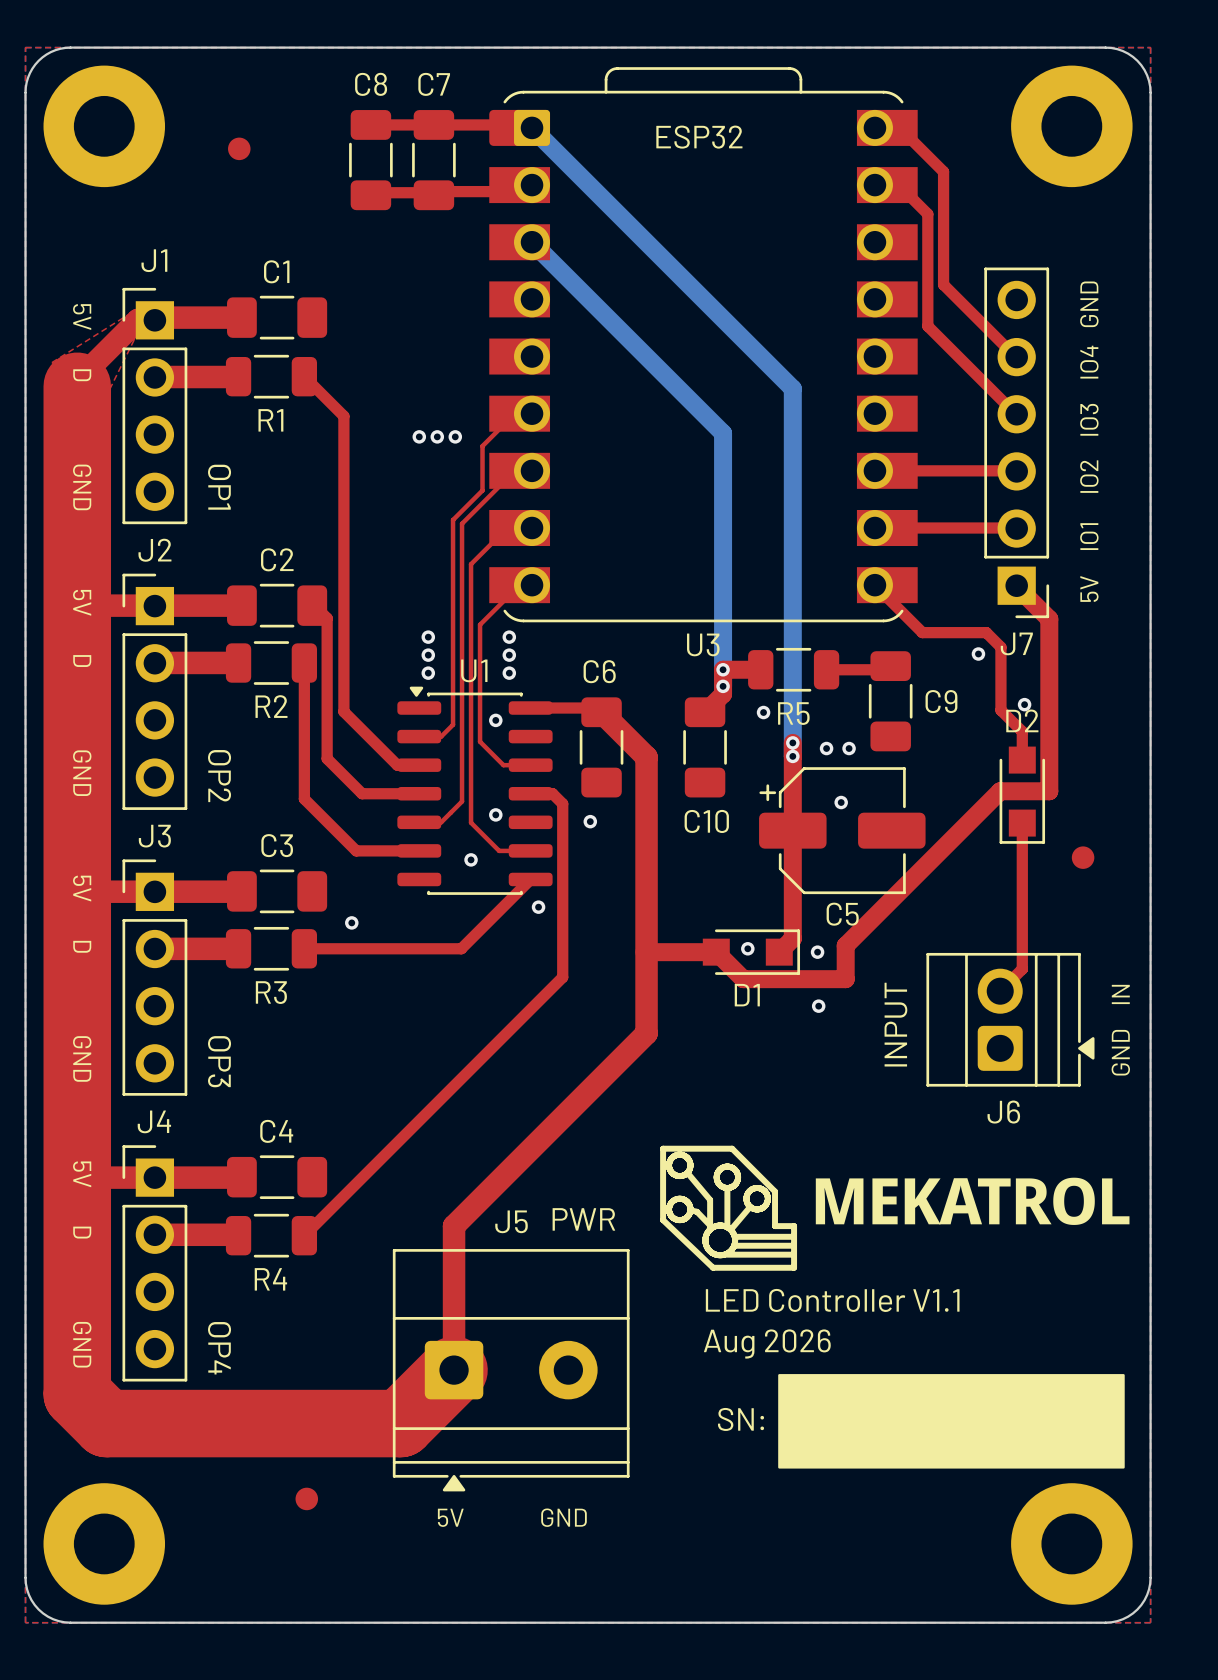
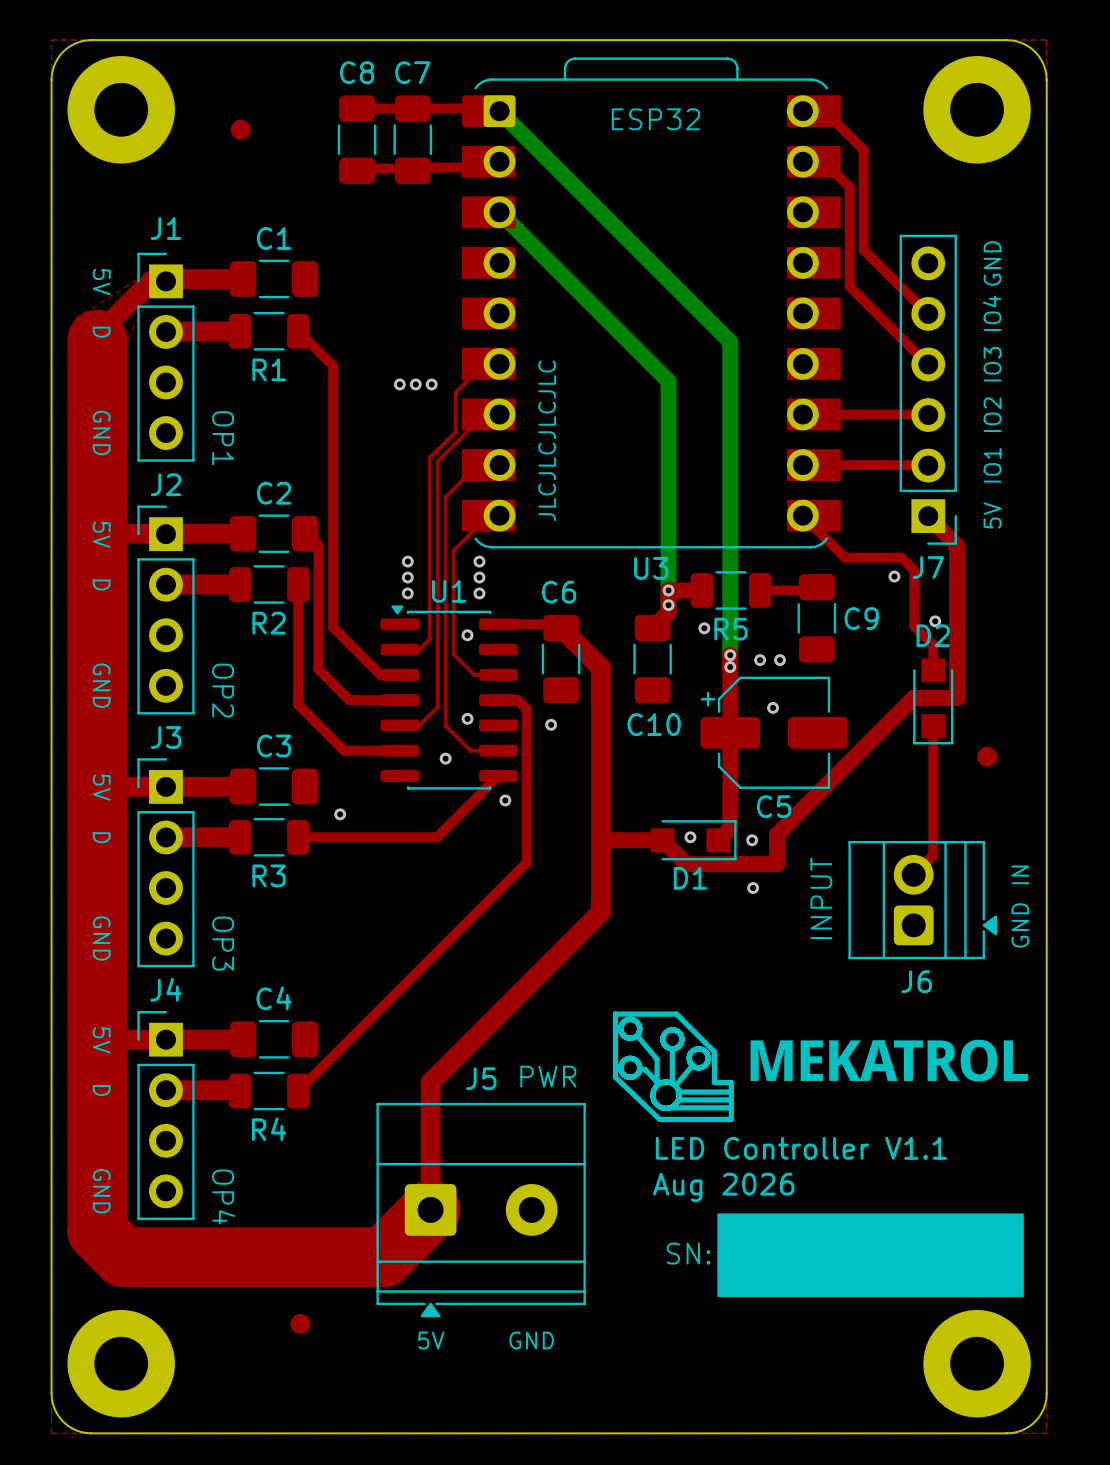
text: none -> JLCJLCJLCJLC (547, 440)

